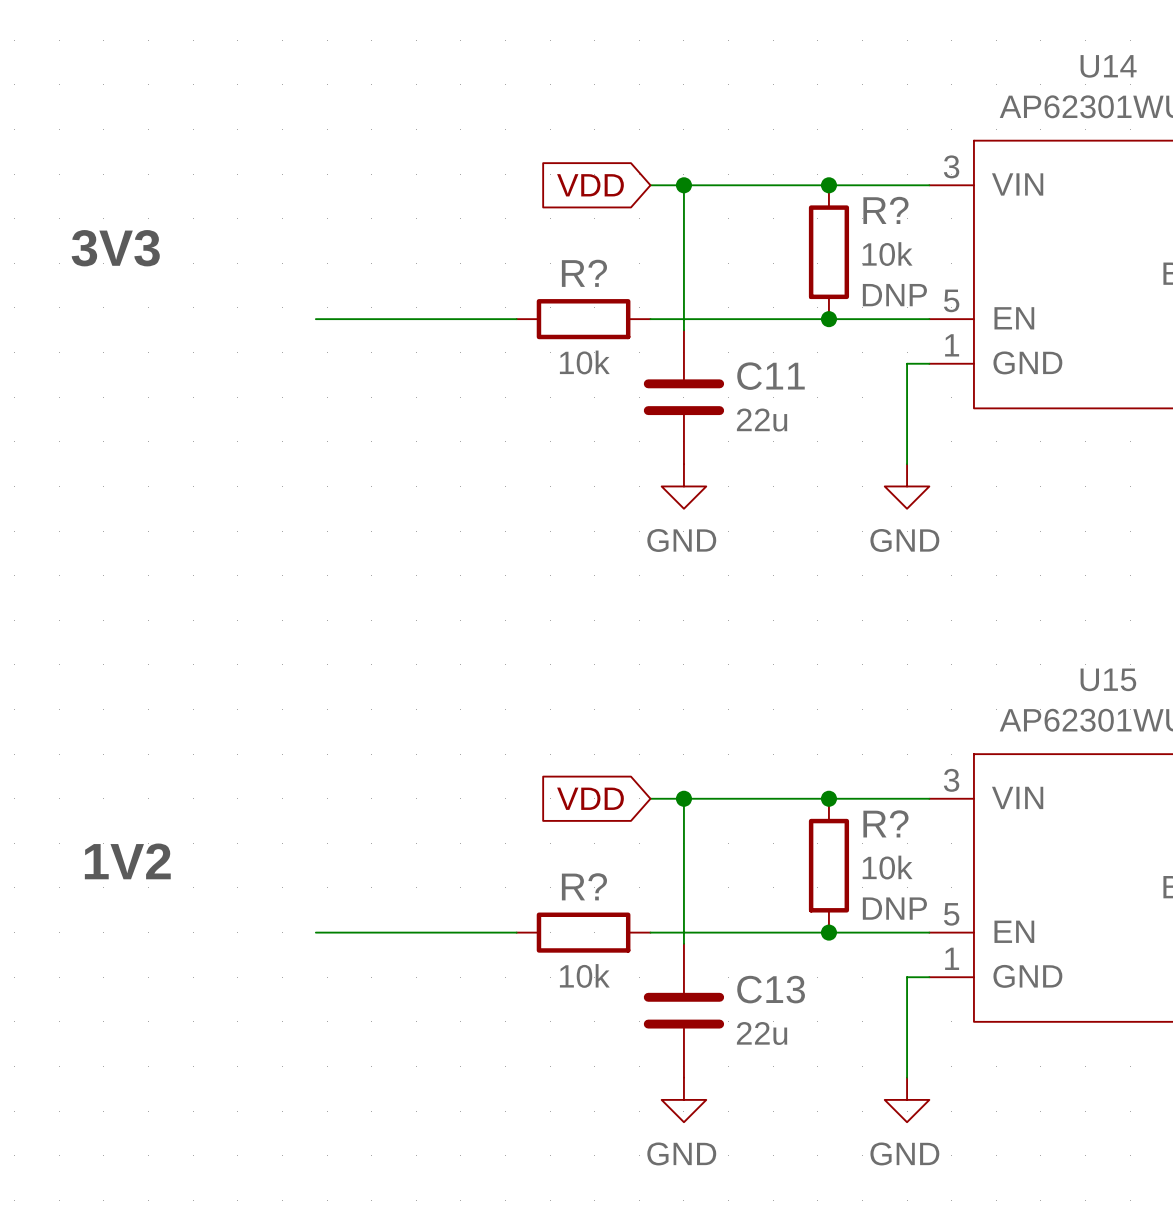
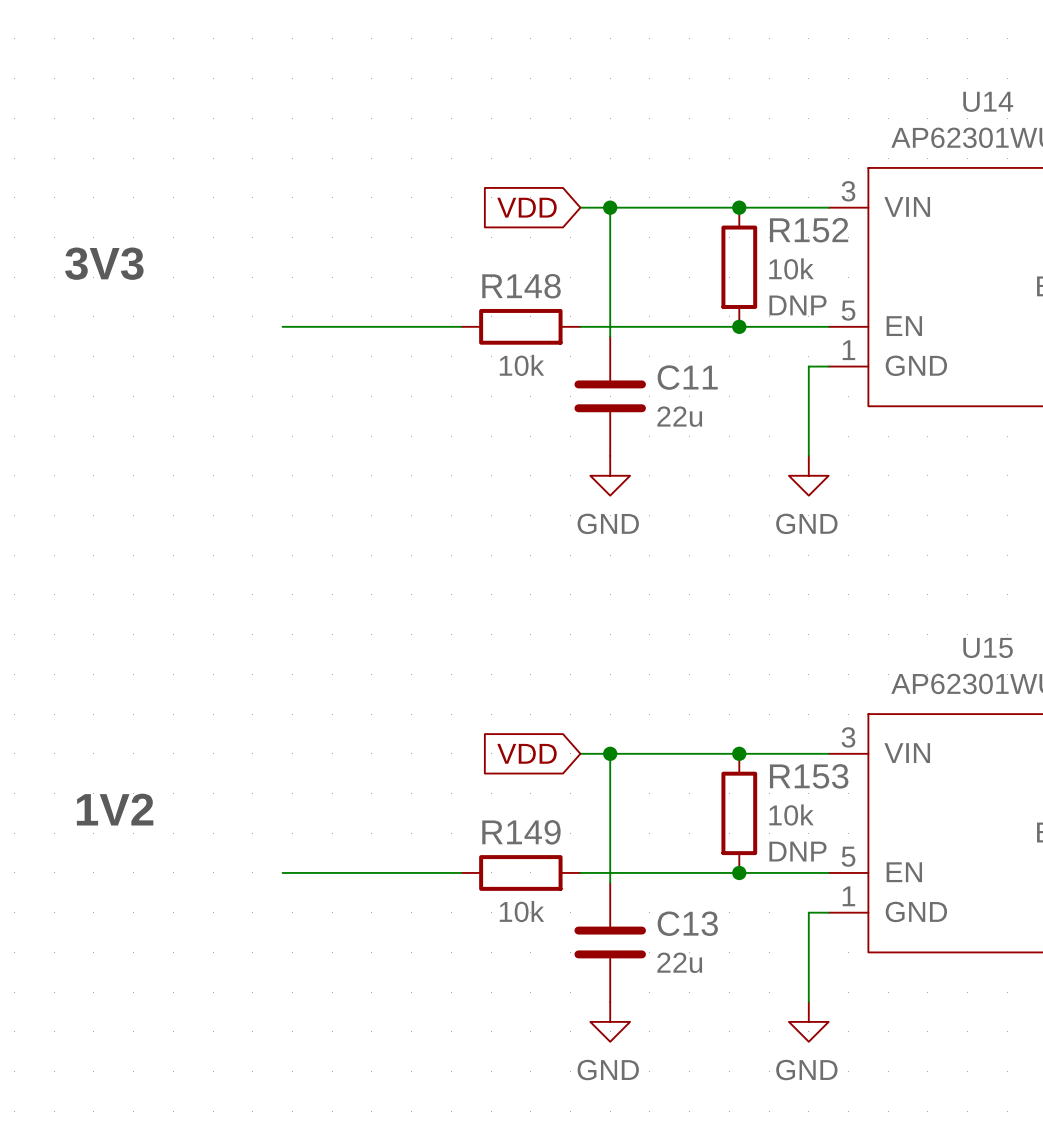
R? name: R? (885, 210) -> R152 (809, 230)
R? name: R? (584, 273) -> R148 (521, 286)
R? name: R? (885, 823) -> R153 (809, 776)
R? name: R? (584, 886) -> R149 (521, 832)

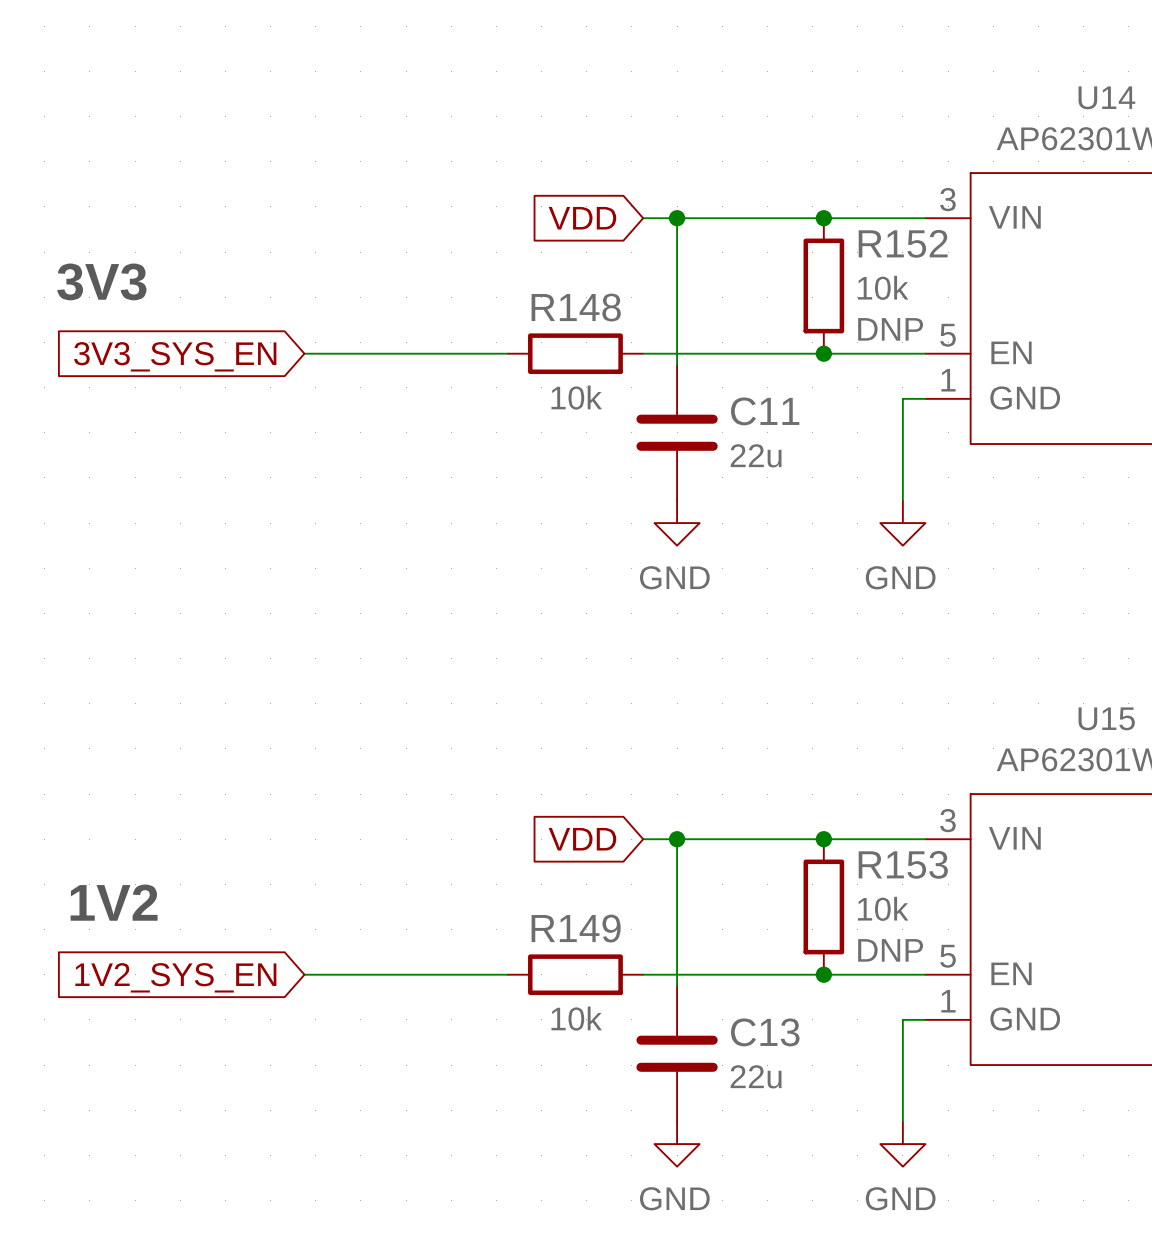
global label: none -> 3V3_SYS_EN (175, 356)
global label: none -> 1V2_SYS_EN (175, 977)

